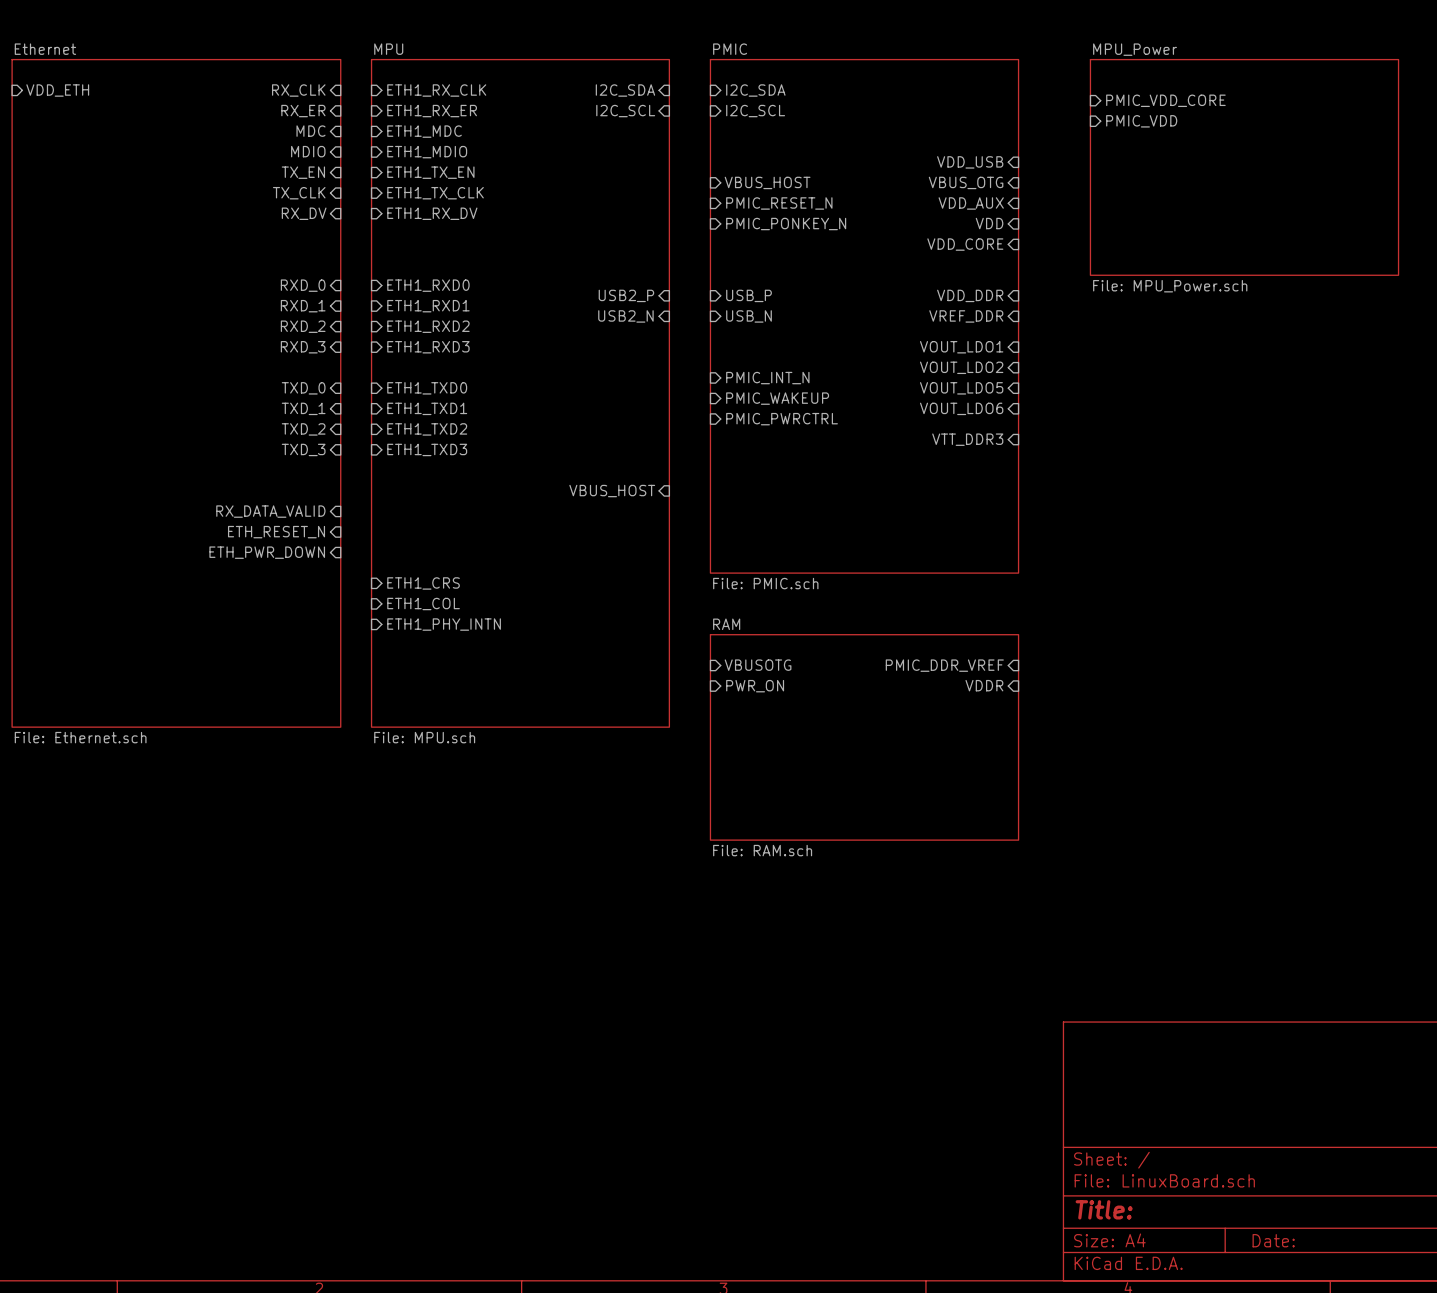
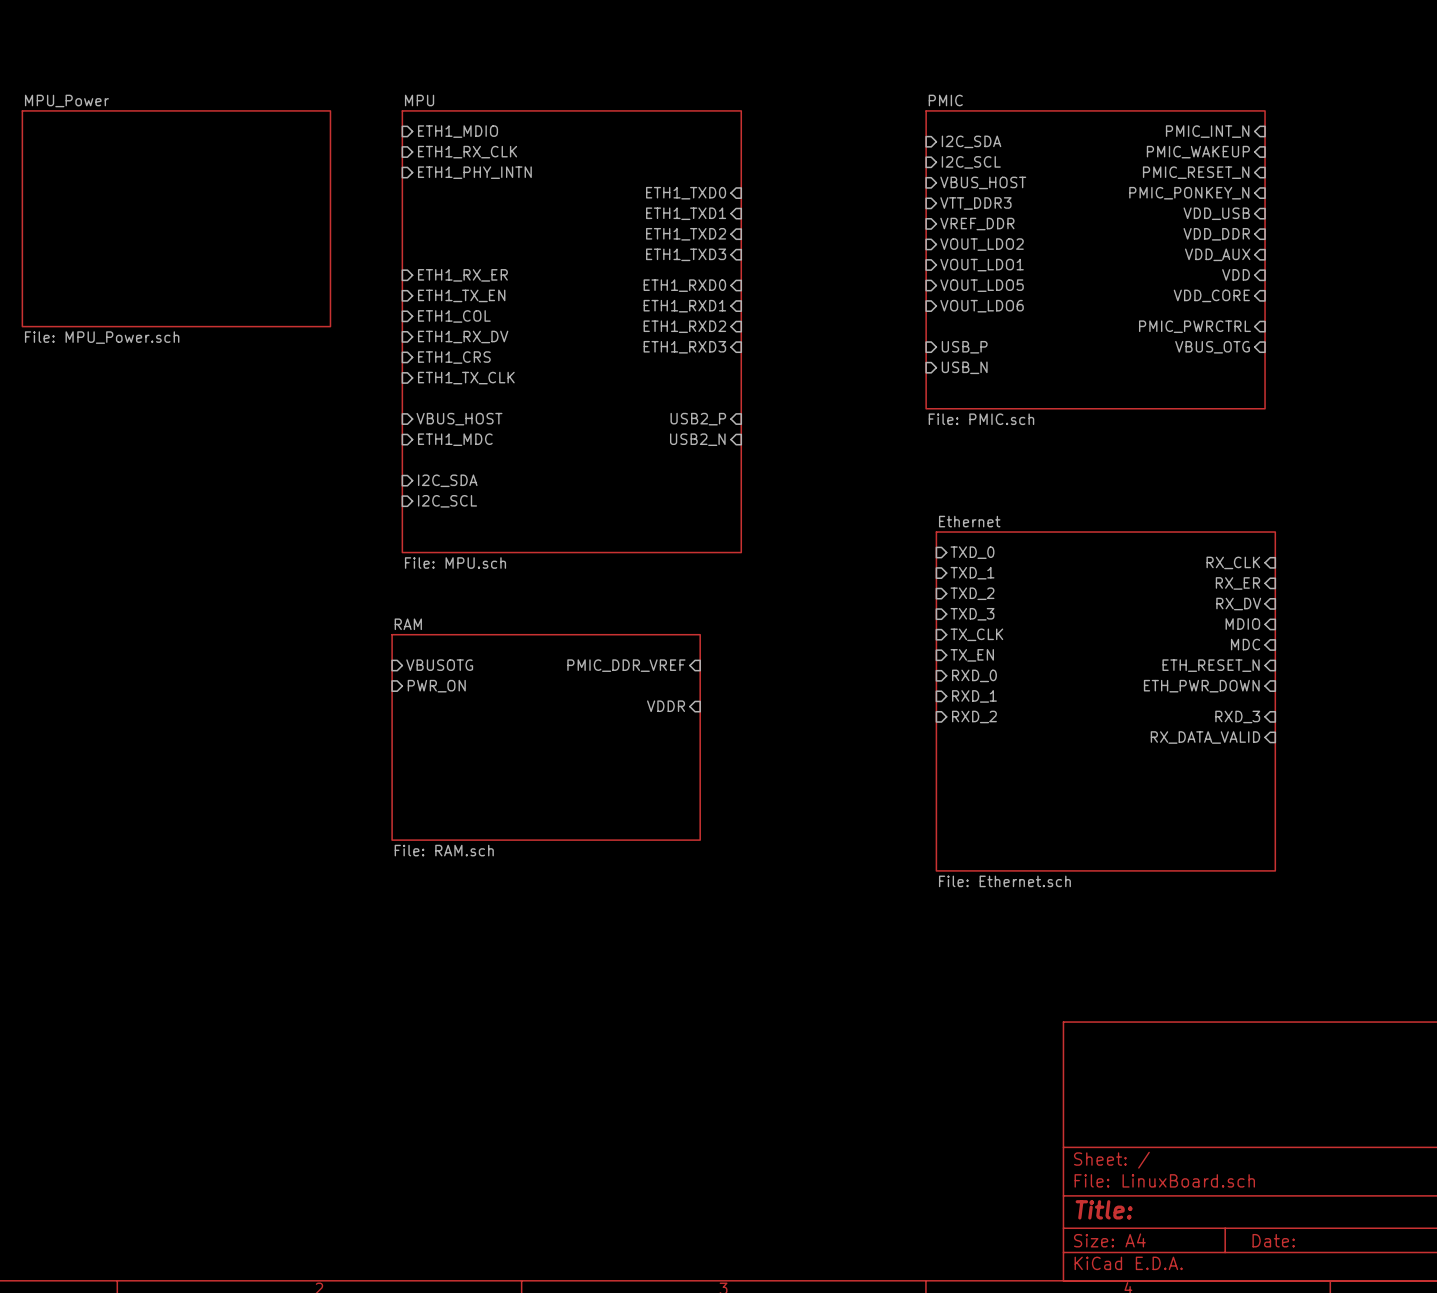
sheet pin: VDD_ETH (57, 90) -> none
sheet pin: RX_CLK (298, 90) -> none
sheet pin position: ETH1_RX_CLK (436, 90) -> ETH1_RX_CLK (467, 152)
sheet pin: I2C_SDA (625, 90) -> none
sheet pin: I2C_SDA (755, 90) -> none
sheet pin: PMIC_VDD_CORE (1165, 100) -> none
sheet pin: RX_ER (303, 111) -> none
sheet pin position: ETH1_RX_ER (432, 111) -> ETH1_RX_ER (462, 275)
sheet pin: I2C_SCL (625, 111) -> none
sheet pin: I2C_SCL (755, 111) -> none
sheet pin: PMIC_VDD (1141, 121) -> none
sheet pin: MDC (310, 131) -> none
sheet pin: ETH1_MDC (424, 131) -> none
sheet pin: none -> PMIC_INT_N (1207, 131)
sheet pin: none -> I2C_SDA (971, 141)
sheet pin: MDIO (308, 151) -> none
sheet pin position: ETH1_MDIO (427, 152) -> ETH1_MDIO (458, 131)
sheet pin: none -> PMIC_WAKEUP (1198, 152)
sheet pin: VDD_USB (970, 162) -> none
sheet pin: none -> I2C_SCL (971, 162)
sheet MPU_Power: File: MPU_Power.sch (1244, 167) -> none
sheet pin: TX_EN (303, 172) -> none
sheet pin position: ETH1_TX_EN (430, 172) -> ETH1_TX_EN (461, 295)
sheet pin: none -> ETH1_PHY_INTN (474, 172)
sheet pin: none -> PMIC_RESET_N (1196, 172)
sheet pin: VBUS_HOST (767, 182) -> none
sheet pin: VBUS_OTG (966, 182) -> VBUS_HOST (983, 182)
sheet pin: TX_CLK (299, 193) -> none
sheet pin position: ETH1_TX_CLK (435, 193) -> ETH1_TX_CLK (466, 378)
sheet pin: none -> ETH1_TXD0 (686, 193)
sheet pin: none -> PMIC_PONKEY_N (1189, 193)
sheet pin: PMIC_RESET_N (779, 203) -> none
sheet pin: VDD_AUX (971, 203) -> none
sheet pin: none -> VTT_DDR3 (975, 203)
sheet pin: RX_DV (304, 213) -> none
sheet pin position: ETH1_RX_DV (432, 213) -> ETH1_RX_DV (463, 336)
sheet pin: none -> ETH1_TXD1 (686, 213)
sheet pin: none -> VDD_USB (1216, 213)
sheet MPU_Power: none -> File: MPU_Power.sch (176, 218)
sheet pin: VDD (989, 223) -> none
sheet pin: PMIC_PONKEY_N (786, 224) -> none
sheet pin: none -> ETH1_TXD2 (686, 234)
sheet pin: none -> VDD_DDR (1216, 234)
sheet pin: VDD_CORE (965, 244) -> none
sheet pin: none -> ETH1_TXD3 (686, 254)
sheet pin: none -> VDD_AUX (1217, 254)
sheet PMIC: none -> File: PMIC.sch (1095, 259)
sheet pin: none -> VDD (1236, 274)
sheet pin: RXD_0 (303, 285) -> none
sheet pin: ETH1_RXD0 (428, 285) -> none
sheet pin: none -> ETH1_RXD0 (684, 285)
sheet pin position: USB2_P (626, 295) -> USB2_P (698, 419)
sheet pin: USB_P (749, 295) -> none
sheet pin: VDD_DDR (970, 295) -> none
sheet pin: none -> VDD_CORE (1211, 295)
sheet pin: RXD_1 (303, 306) -> none
sheet pin: ETH1_RXD1 (428, 306) -> none
sheet pin: none -> ETH1_RXD1 (684, 306)
sheet pin: none -> ETH1_COL (454, 316)
sheet pin position: USB2_N (625, 316) -> USB2_N (697, 439)
sheet pin: USB_N (749, 316) -> none
sheet PMIC: File: PMIC.sch (864, 316) -> none
sheet pin rotation: 0° (966, 316) -> 180° (977, 224)
sheet pin position: VREF_DDR (966, 316) -> VREF_DDR (977, 224)
sheet pin: RXD_2 (303, 326) -> none
sheet pin: ETH1_RXD2 (428, 326) -> none
sheet pin: none -> ETH1_RXD2 (684, 326)
sheet pin: none -> PMIC_PWRCTRL (1194, 326)
sheet MPU: none -> File: MPU.sch (571, 331)
sheet pin: RXD_3 (303, 347) -> none
sheet pin: ETH1_RXD3 (428, 347) -> ETH1_CRS (454, 357)
sheet pin: none -> ETH1_RXD3 (684, 347)
sheet pin rotation: 0° (961, 347) -> 180° (982, 265)
sheet pin: none -> USB_P (964, 347)
sheet pin: none -> VBUS_OTG (1212, 347)
sheet pin rotation: 0° (961, 367) -> 180° (982, 244)
sheet pin position: VOUT_LDO2 (961, 367) -> VOUT_LDO2 (982, 244)
sheet pin: none -> USB_N (964, 367)
sheet pin: PMIC_INT_N (767, 378) -> none
sheet pin: TXD_0 (303, 388) -> none
sheet pin: ETH1_TXD0 (427, 388) -> none
sheet pin rotation: 0° (961, 388) -> 180° (982, 285)
sheet pin position: VOUT_LDO5 (961, 388) -> VOUT_LDO5 (982, 285)
sheet Ethernet: File: Ethernet.sch (176, 393) -> none
sheet MPU: File: MPU.sch (520, 393) -> none
sheet pin: PMIC_WAKEUP (777, 398) -> none
sheet pin: TXD_1 (303, 408) -> none
sheet pin: ETH1_TXD1 (427, 408) -> none
sheet pin rotation: 0° (961, 408) -> 180° (982, 306)
sheet pin position: VOUT_LDO6 (961, 408) -> VOUT_LDO6 (982, 306)
sheet pin: none -> VBUS_HOST (459, 419)
sheet pin: PMIC_PWRCTRL (782, 419) -> none
sheet pin: TXD_2 (303, 429) -> none
sheet pin: ETH1_TXD2 (427, 429) -> none
sheet pin: none -> ETH1_MDC (455, 439)
sheet pin: VTT_DDR3 (967, 439) -> none
sheet pin: TXD_3 (303, 449) -> none
sheet pin: ETH1_TXD3 (427, 449) -> none
sheet pin: none -> I2C_SDA (447, 480)
sheet pin: VBUS_HOST (612, 491) -> none
sheet pin: none -> I2C_SCL (447, 501)
sheet pin: RX_DATA_VALID (270, 511) -> none
sheet pin: ETH_RESET_N (276, 532) -> none
sheet pin: ETH_PWR_DOWN (267, 552) -> none
sheet pin: none -> TXD_0 (972, 552)
sheet pin: none -> RX_CLK (1233, 562)
sheet pin: none -> TXD_1 (972, 573)
sheet pin: ETH1_CRS (423, 583) -> none
sheet pin: none -> RX_ER (1237, 583)
sheet pin: none -> TXD_2 (972, 593)
sheet pin: ETH1_COL (423, 604) -> none
sheet pin: none -> RX_DV (1238, 604)
sheet pin: none -> TXD_3 (972, 614)
sheet pin: ETH1_PHY_INTN (444, 624) -> none
sheet pin: none -> MDIO (1242, 624)
sheet pin: none -> TX_CLK (976, 634)
sheet pin: none -> MDC (1245, 644)
sheet pin: none -> TX_EN (972, 655)
sheet pin: none -> VBUSOTG (439, 665)
sheet pin: none -> PMIC_DDR_VREF (626, 665)
sheet pin: VBUSOTG (758, 665) -> none
sheet pin: PMIC_DDR_VREF (944, 665) -> none
sheet pin: none -> ETH_RESET_N (1211, 665)
sheet pin: none -> RXD_0 (974, 675)
sheet pin: VDDR (984, 685) -> none
sheet pin: none -> PWR_ON (436, 686)
sheet pin: PWR_ON (755, 686) -> none
sheet pin: none -> ETH_PWR_DOWN (1201, 686)
sheet pin: none -> RXD_1 (974, 696)
sheet Ethernet: none -> File: Ethernet.sch (1105, 701)
sheet pin: none -> VDDR (666, 706)
sheet pin: none -> RXD_2 (974, 716)
sheet pin: none -> RXD_3 (1237, 716)
sheet RAM: none -> File: RAM.sch (546, 737)
sheet RAM: File: RAM.sch (864, 737) -> none
sheet pin: none -> RX_DATA_VALID (1205, 737)

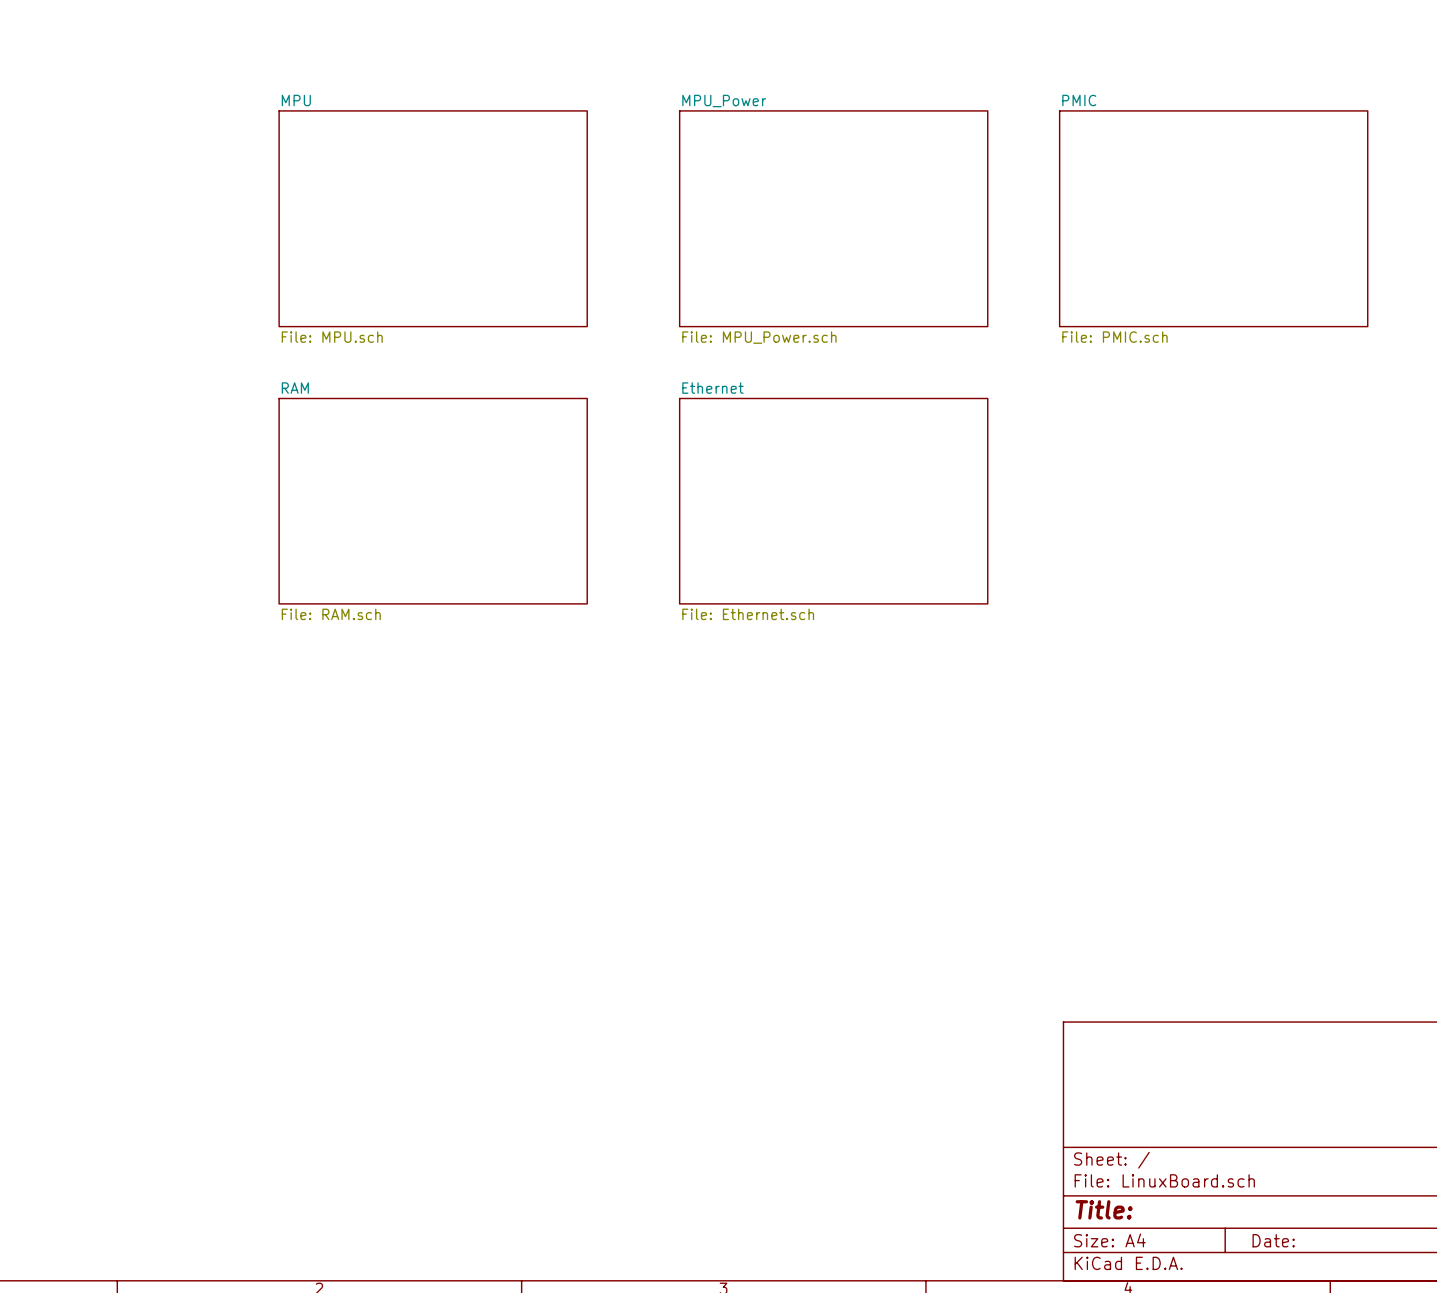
sheet pin: ETH1_MDIO (458, 131) -> none
sheet pin: PMIC_INT_N (1207, 131) -> none
sheet pin: I2C_SDA (971, 141) -> none
sheet pin: ETH1_RX_CLK (467, 152) -> none
sheet pin: PMIC_WAKEUP (1198, 152) -> none
sheet pin: I2C_SCL (971, 162) -> none
sheet pin: ETH1_PHY_INTN (474, 172) -> none
sheet pin: PMIC_RESET_N (1196, 172) -> none
sheet pin: VBUS_HOST (983, 182) -> none
sheet pin: ETH1_TXD0 (686, 193) -> none
sheet pin: PMIC_PONKEY_N (1189, 193) -> none
sheet pin: VTT_DDR3 (975, 203) -> none
sheet pin: ETH1_TXD1 (686, 213) -> none
sheet pin: VDD_USB (1216, 213) -> none
sheet MPU_Power: File: MPU_Power.sch (176, 218) -> none
sheet MPU: none -> File: MPU.sch (433, 218)
sheet MPU_Power: none -> File: MPU_Power.sch (833, 218)
sheet PMIC: none -> File: PMIC.sch (1213, 218)
sheet pin: VREF_DDR (977, 224) -> none
sheet pin: ETH1_TXD2 (686, 234) -> none
sheet pin: VDD_DDR (1216, 234) -> none
sheet pin: VOUT_LDO2 (982, 244) -> none
sheet pin: ETH1_TXD3 (686, 254) -> none
sheet pin: VDD_AUX (1217, 254) -> none
sheet PMIC: File: PMIC.sch (1095, 259) -> none
sheet pin: VOUT_LDO1 (982, 265) -> none
sheet pin: VDD (1236, 274) -> none
sheet pin: ETH1_RX_ER (462, 275) -> none
sheet pin: ETH1_RXD0 (684, 285) -> none
sheet pin: VOUT_LDO5 (982, 285) -> none
sheet pin: ETH1_TX_EN (461, 295) -> none
sheet pin: VDD_CORE (1211, 295) -> none
sheet pin: ETH1_RXD1 (684, 306) -> none
sheet pin: VOUT_LDO6 (982, 306) -> none
sheet pin: ETH1_COL (454, 316) -> none
sheet pin: ETH1_RXD2 (684, 326) -> none
sheet pin: PMIC_PWRCTRL (1194, 326) -> none
sheet MPU: File: MPU.sch (571, 331) -> none
sheet pin: ETH1_RX_DV (463, 336) -> none
sheet pin: ETH1_RXD3 (684, 347) -> none
sheet pin: USB_P (964, 347) -> none
sheet pin: VBUS_OTG (1212, 347) -> none
sheet pin: ETH1_CRS (454, 357) -> none
sheet pin: USB_N (964, 367) -> none
sheet pin: ETH1_TX_CLK (466, 378) -> none
sheet pin: VBUS_HOST (459, 419) -> none
sheet pin: USB2_P (698, 419) -> none
sheet pin: ETH1_MDC (455, 439) -> none
sheet pin: USB2_N (697, 439) -> none
sheet pin: I2C_SDA (447, 480) -> none
sheet RAM: none -> File: RAM.sch (433, 501)
sheet pin: I2C_SCL (447, 501) -> none
sheet Ethernet: none -> File: Ethernet.sch (833, 501)
sheet pin: TXD_0 (972, 552) -> none
sheet pin: RX_CLK (1233, 562) -> none
sheet pin: TXD_1 (972, 573) -> none
sheet pin: RX_ER (1237, 583) -> none
sheet pin: TXD_2 (972, 593) -> none
sheet pin: RX_DV (1238, 604) -> none
sheet pin: TXD_3 (972, 614) -> none
sheet pin: MDIO (1242, 624) -> none
sheet pin: TX_CLK (976, 634) -> none
sheet pin: MDC (1245, 644) -> none
sheet pin: TX_EN (972, 655) -> none
sheet pin: VBUSOTG (439, 665) -> none
sheet pin: PMIC_DDR_VREF (626, 665) -> none
sheet pin: ETH_RESET_N (1211, 665) -> none
sheet pin: RXD_0 (974, 675) -> none
sheet pin: PWR_ON (436, 686) -> none
sheet pin: ETH_PWR_DOWN (1201, 686) -> none
sheet pin: RXD_1 (974, 696) -> none
sheet Ethernet: File: Ethernet.sch (1105, 701) -> none
sheet pin: VDDR (666, 706) -> none
sheet pin: RXD_2 (974, 716) -> none
sheet pin: RXD_3 (1237, 716) -> none
sheet RAM: File: RAM.sch (546, 737) -> none
sheet pin: RX_DATA_VALID (1205, 737) -> none

